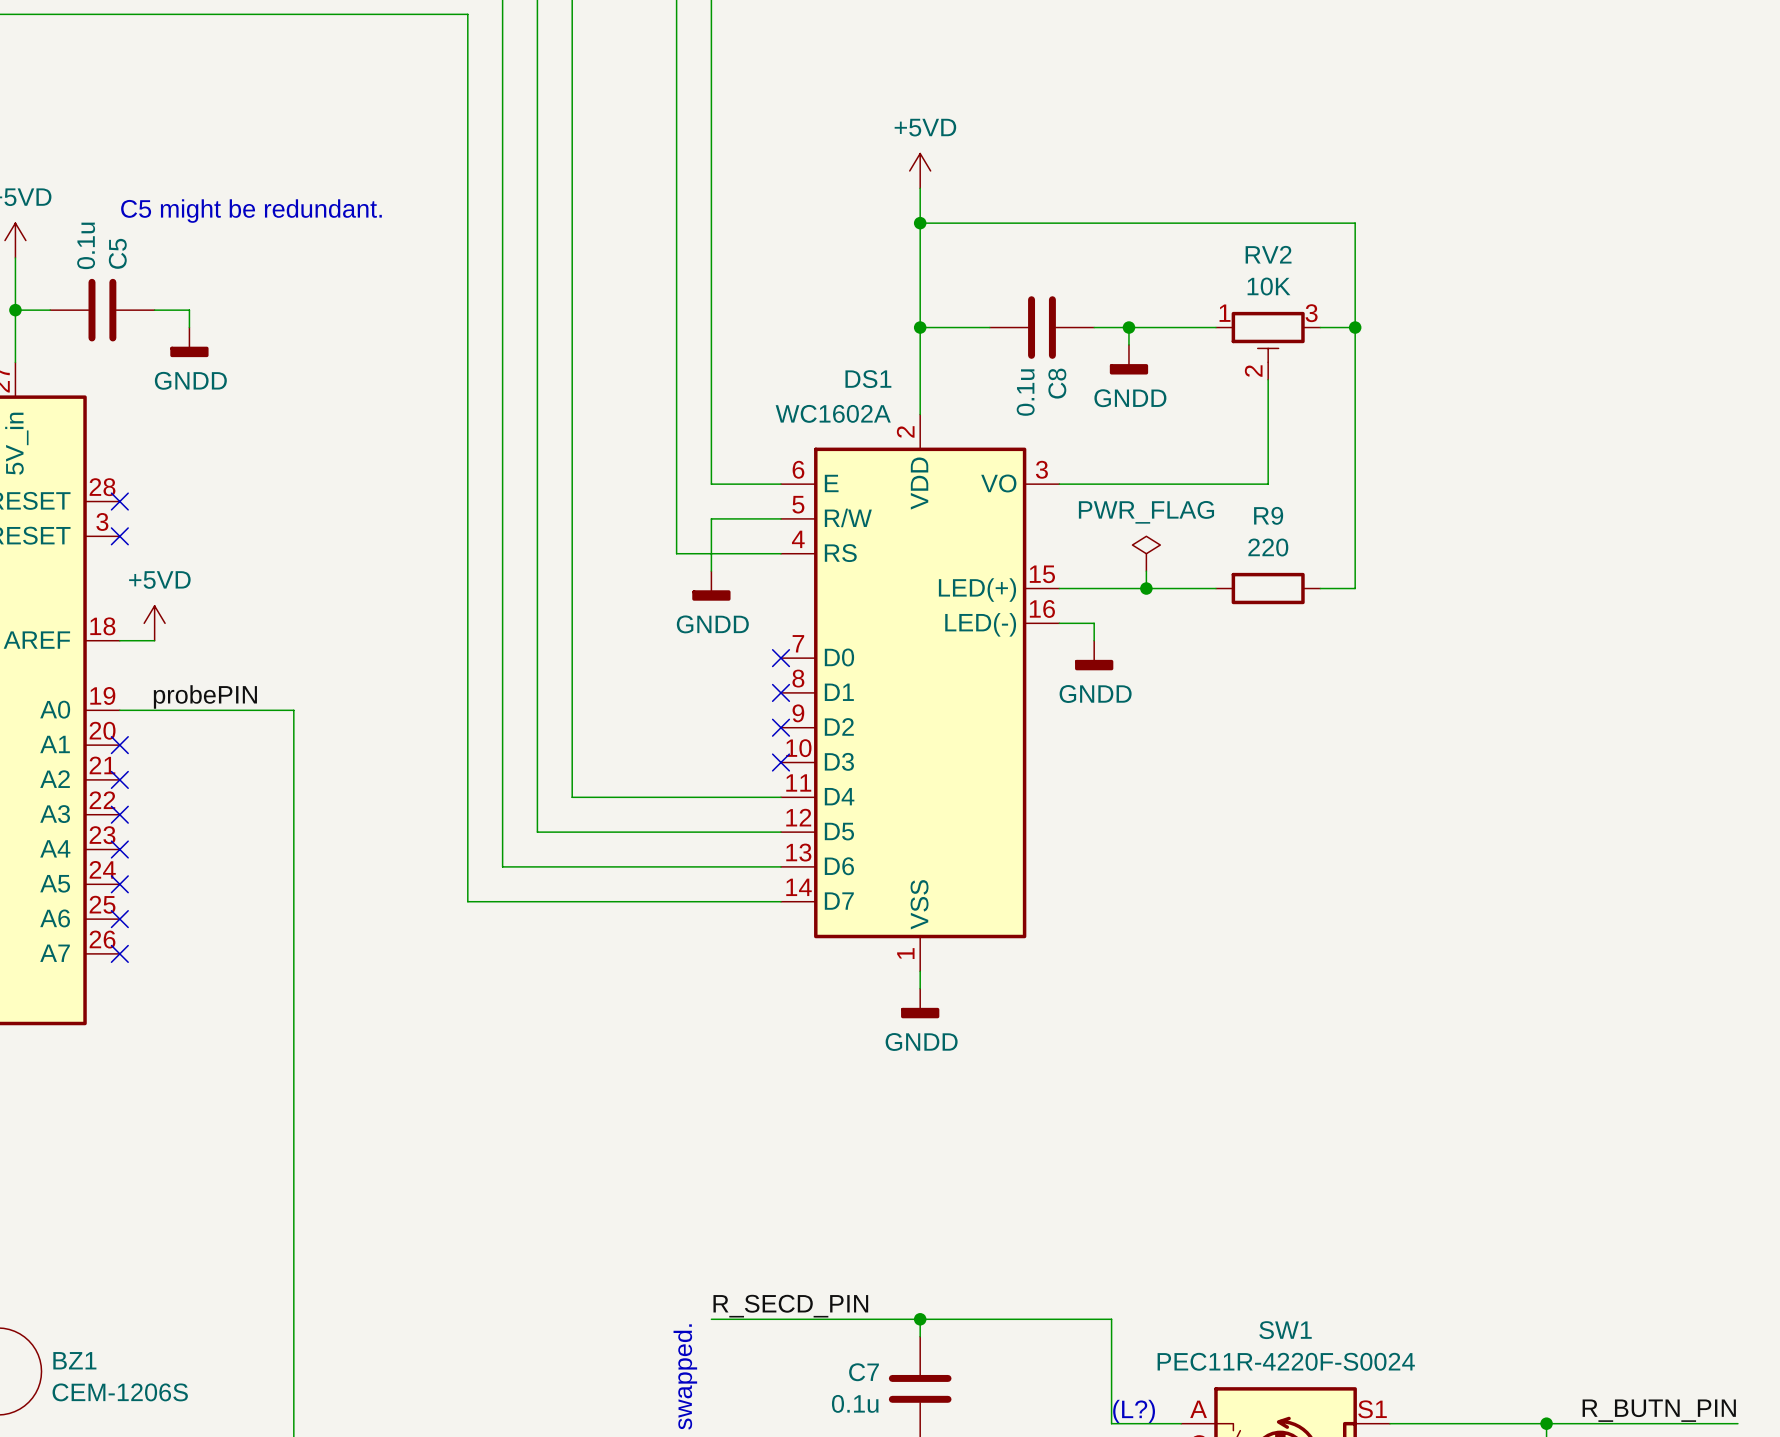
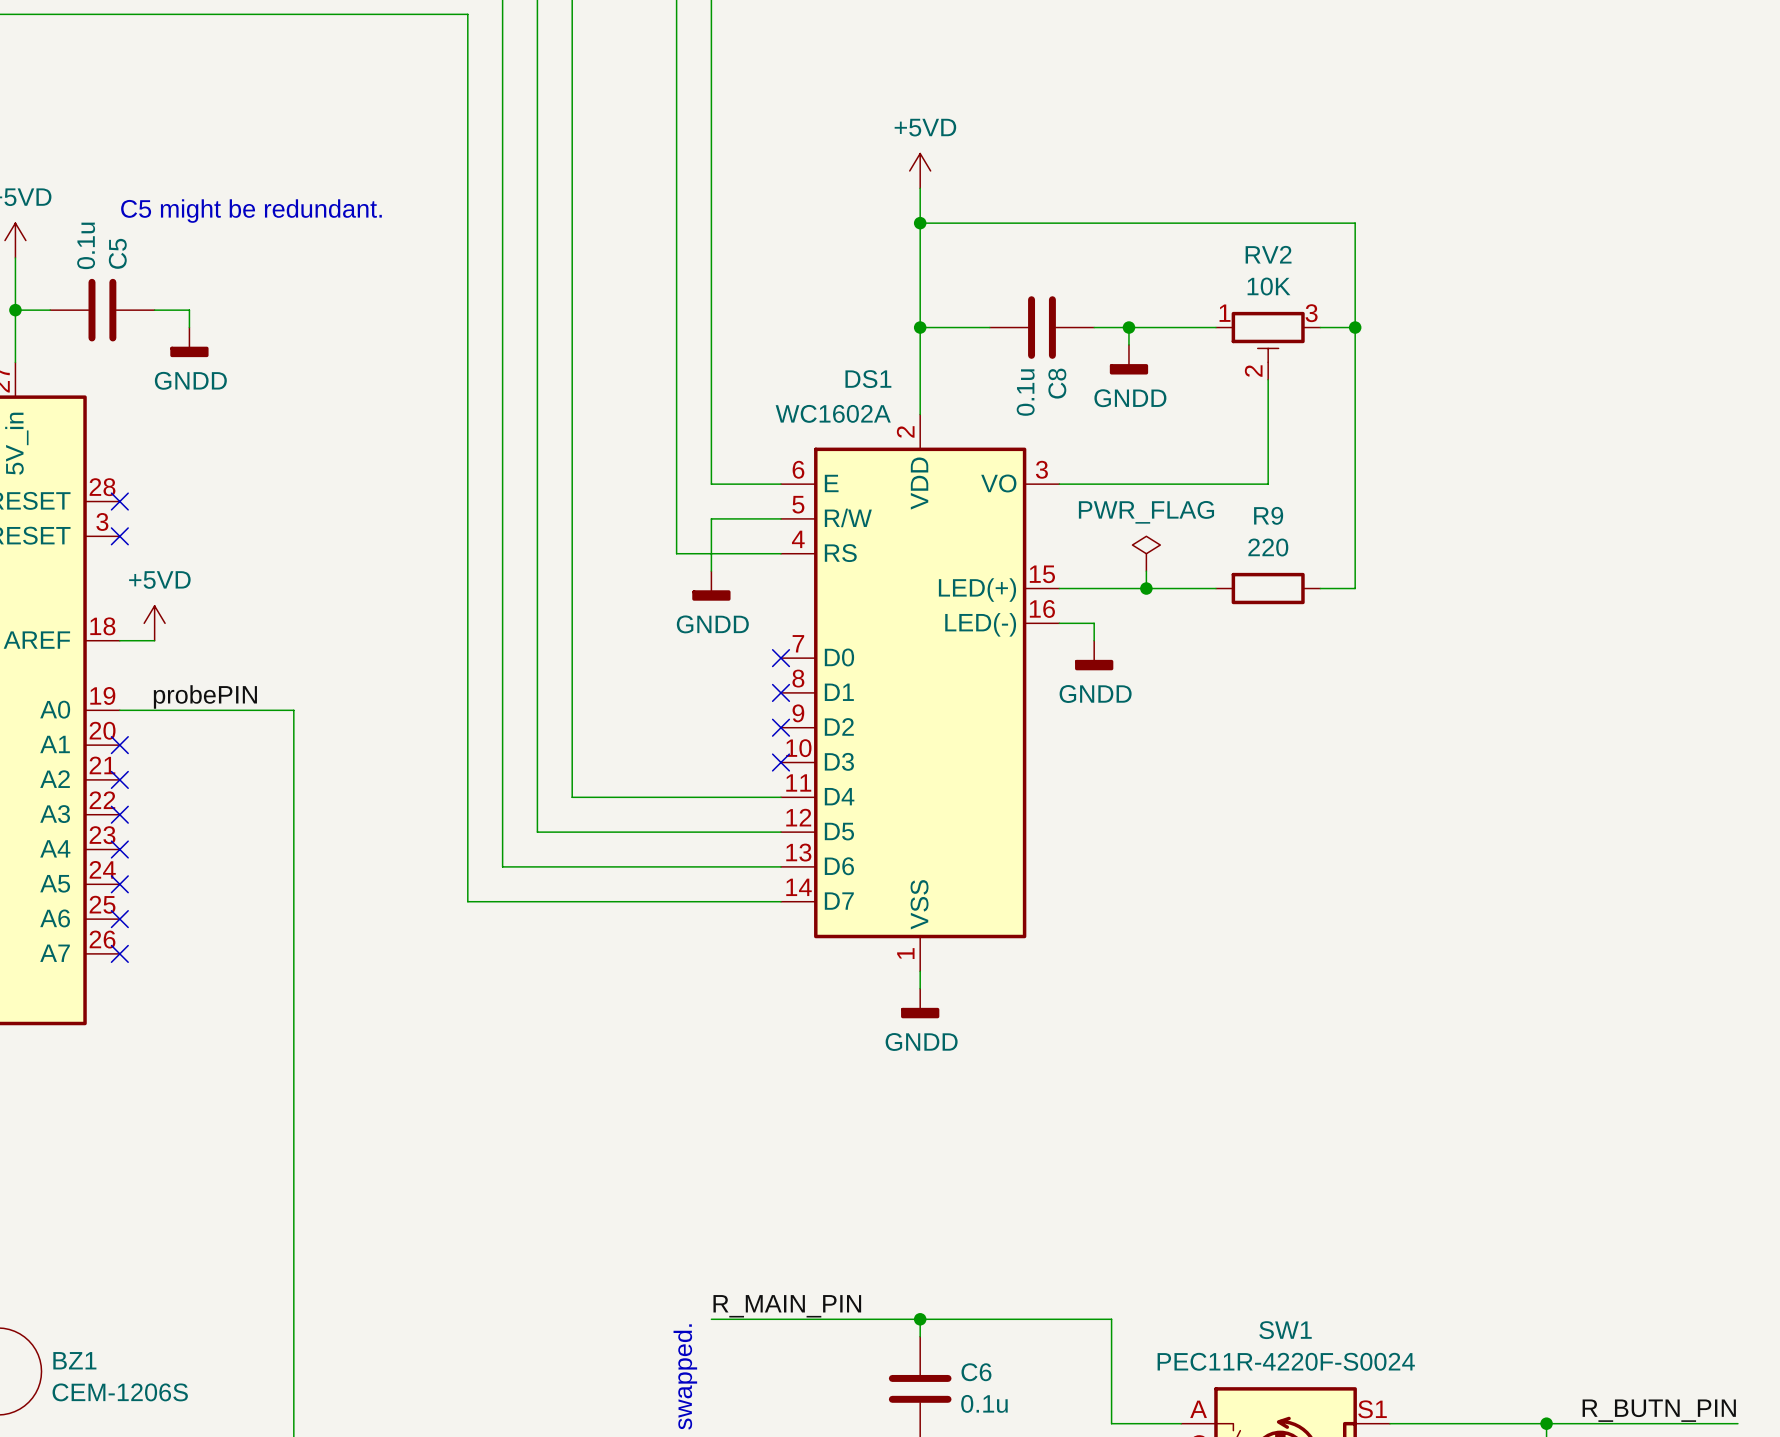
label: R_SECD_PIN (790, 1306) -> R_MAIN_PIN (787, 1306)
C7 name: C7 (864, 1372) -> C6 (976, 1372)
C7 value position: 0.1u (855, 1403) -> 0.1u (984, 1403)
text: (L?) (1134, 1411) -> none

